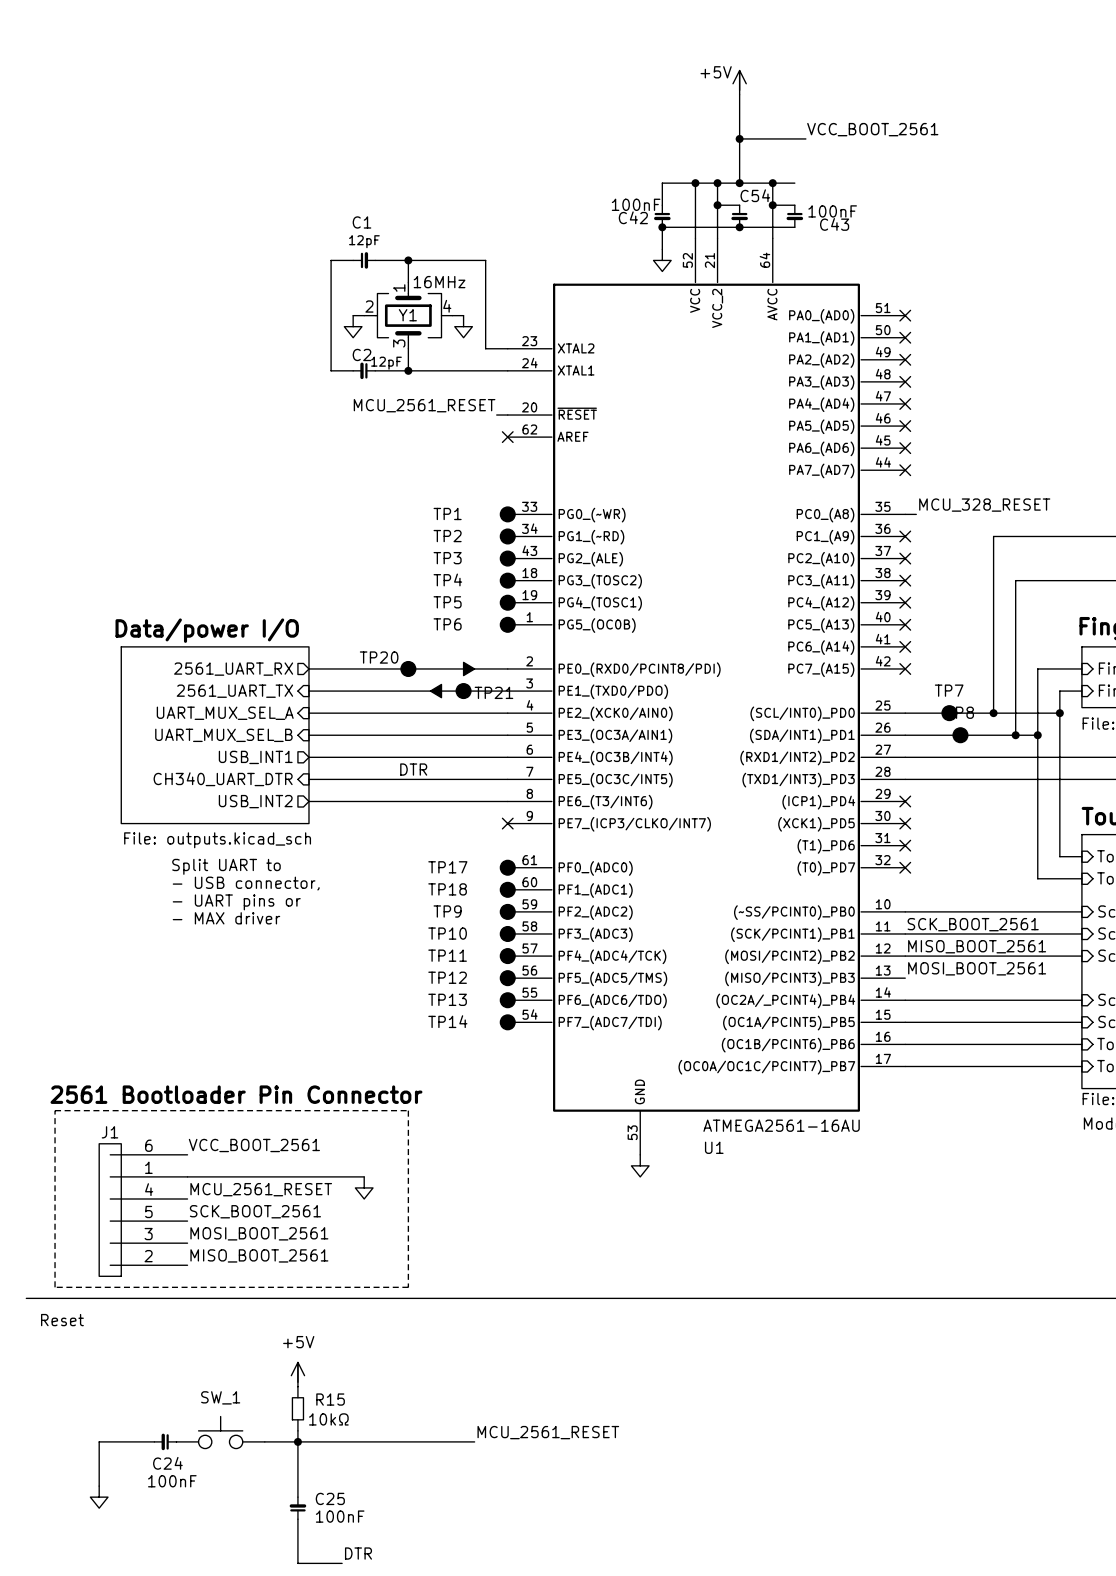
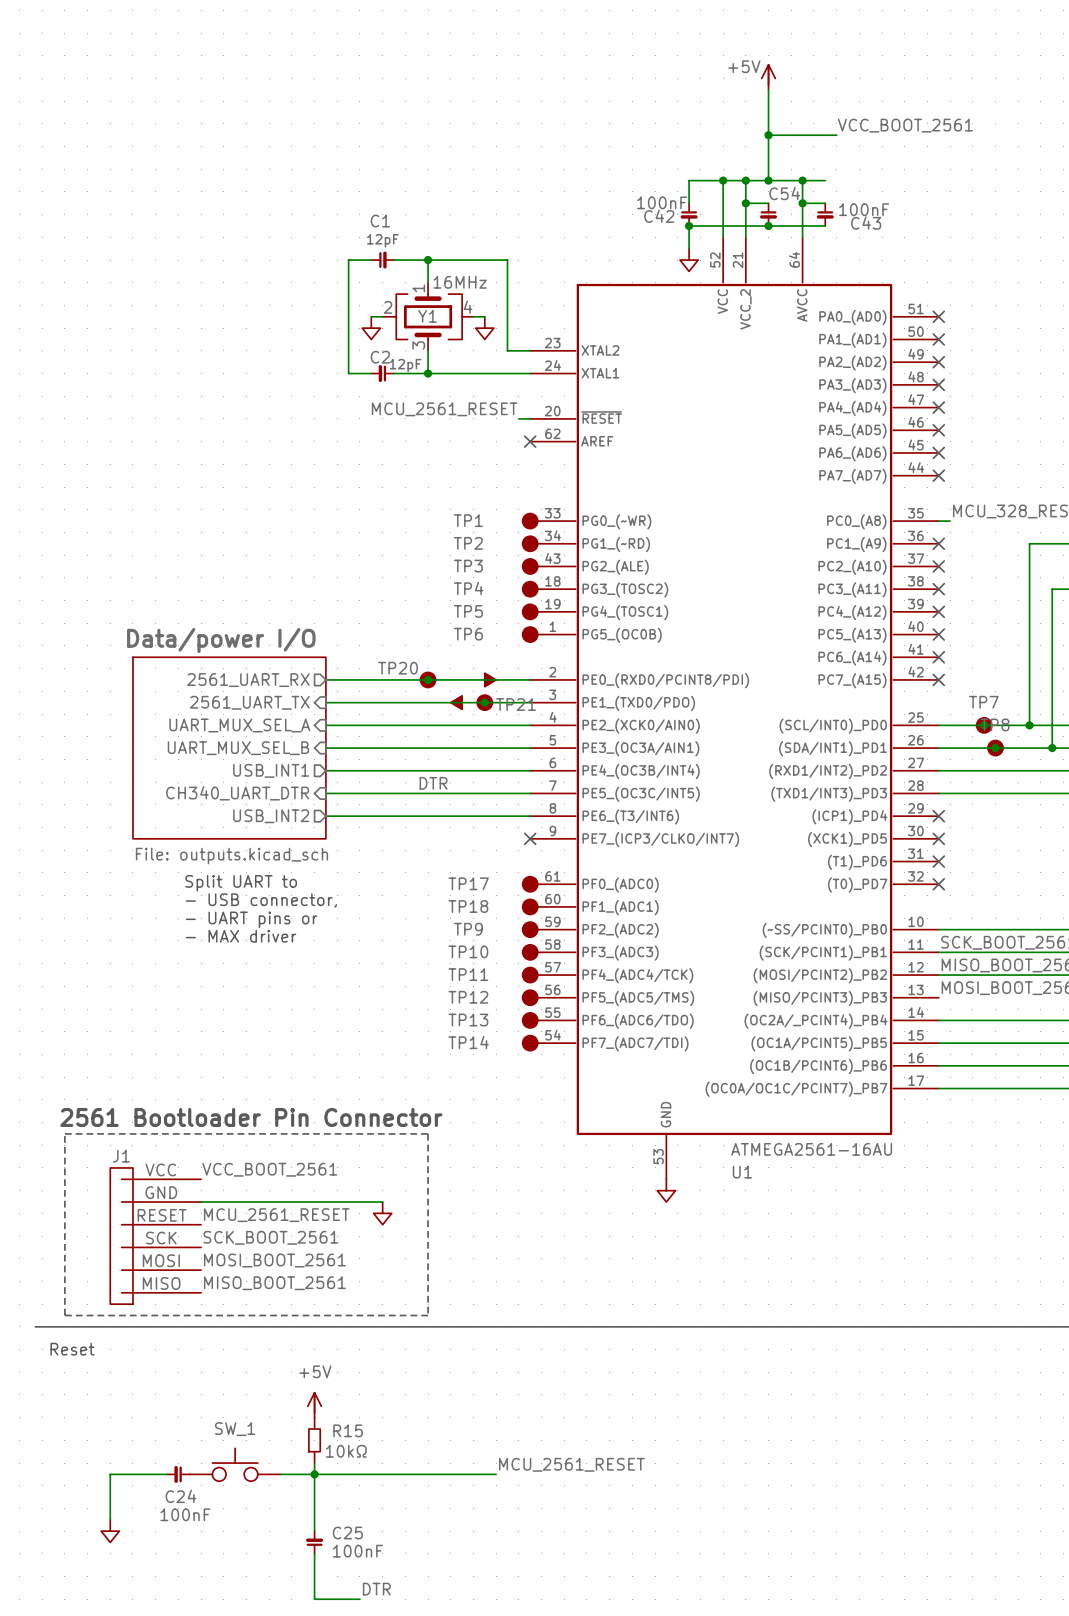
J1 pin number: 6 (148, 1145) -> VCC (160, 1169)
J1 pin number: 1 (148, 1167) -> GND (161, 1192)
J1 pin number: 4 (149, 1189) -> RESET (162, 1215)
J1 pin number: 5 (148, 1211) -> SCK (161, 1238)
J1 pin number: 3 (148, 1234) -> MOSI (161, 1260)
J1 pin number: 2 (148, 1256) -> MISO (161, 1283)

